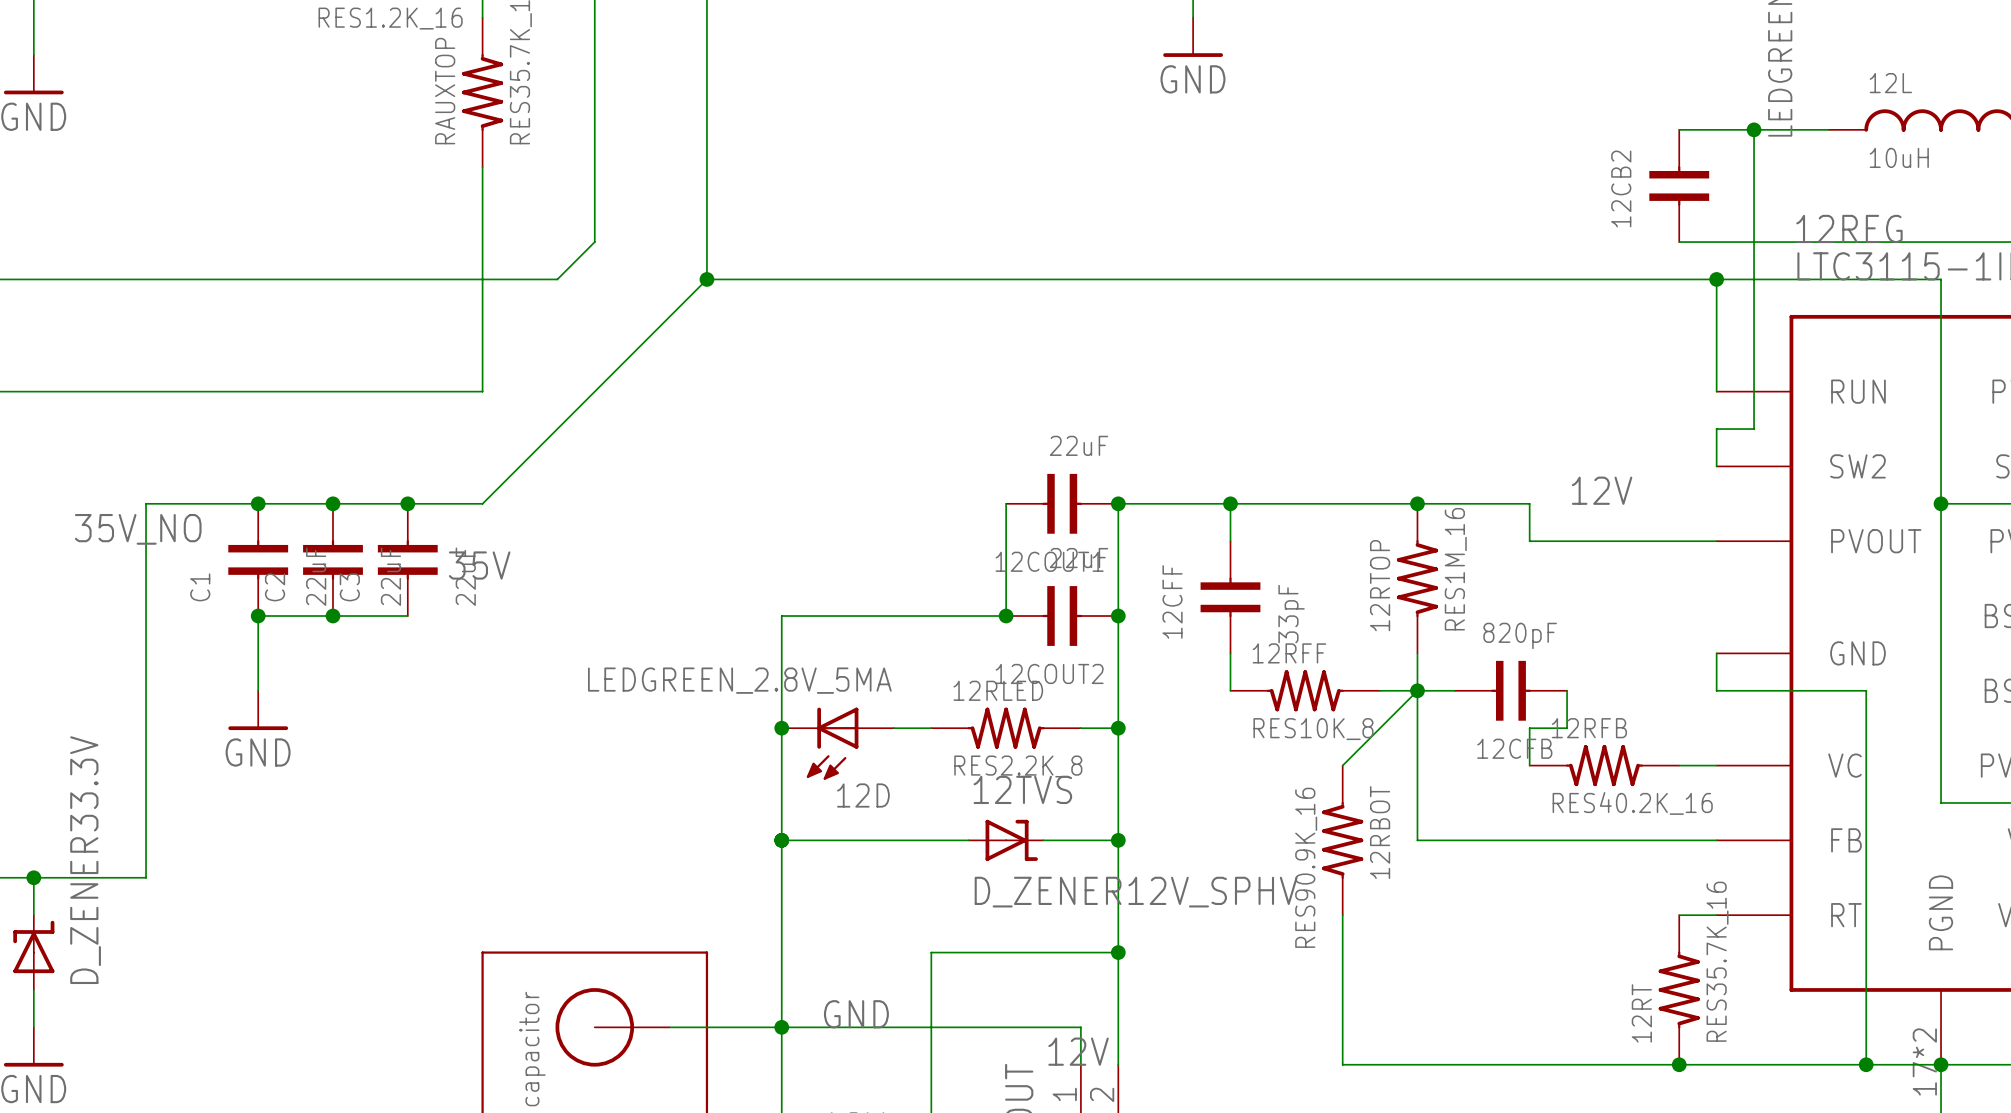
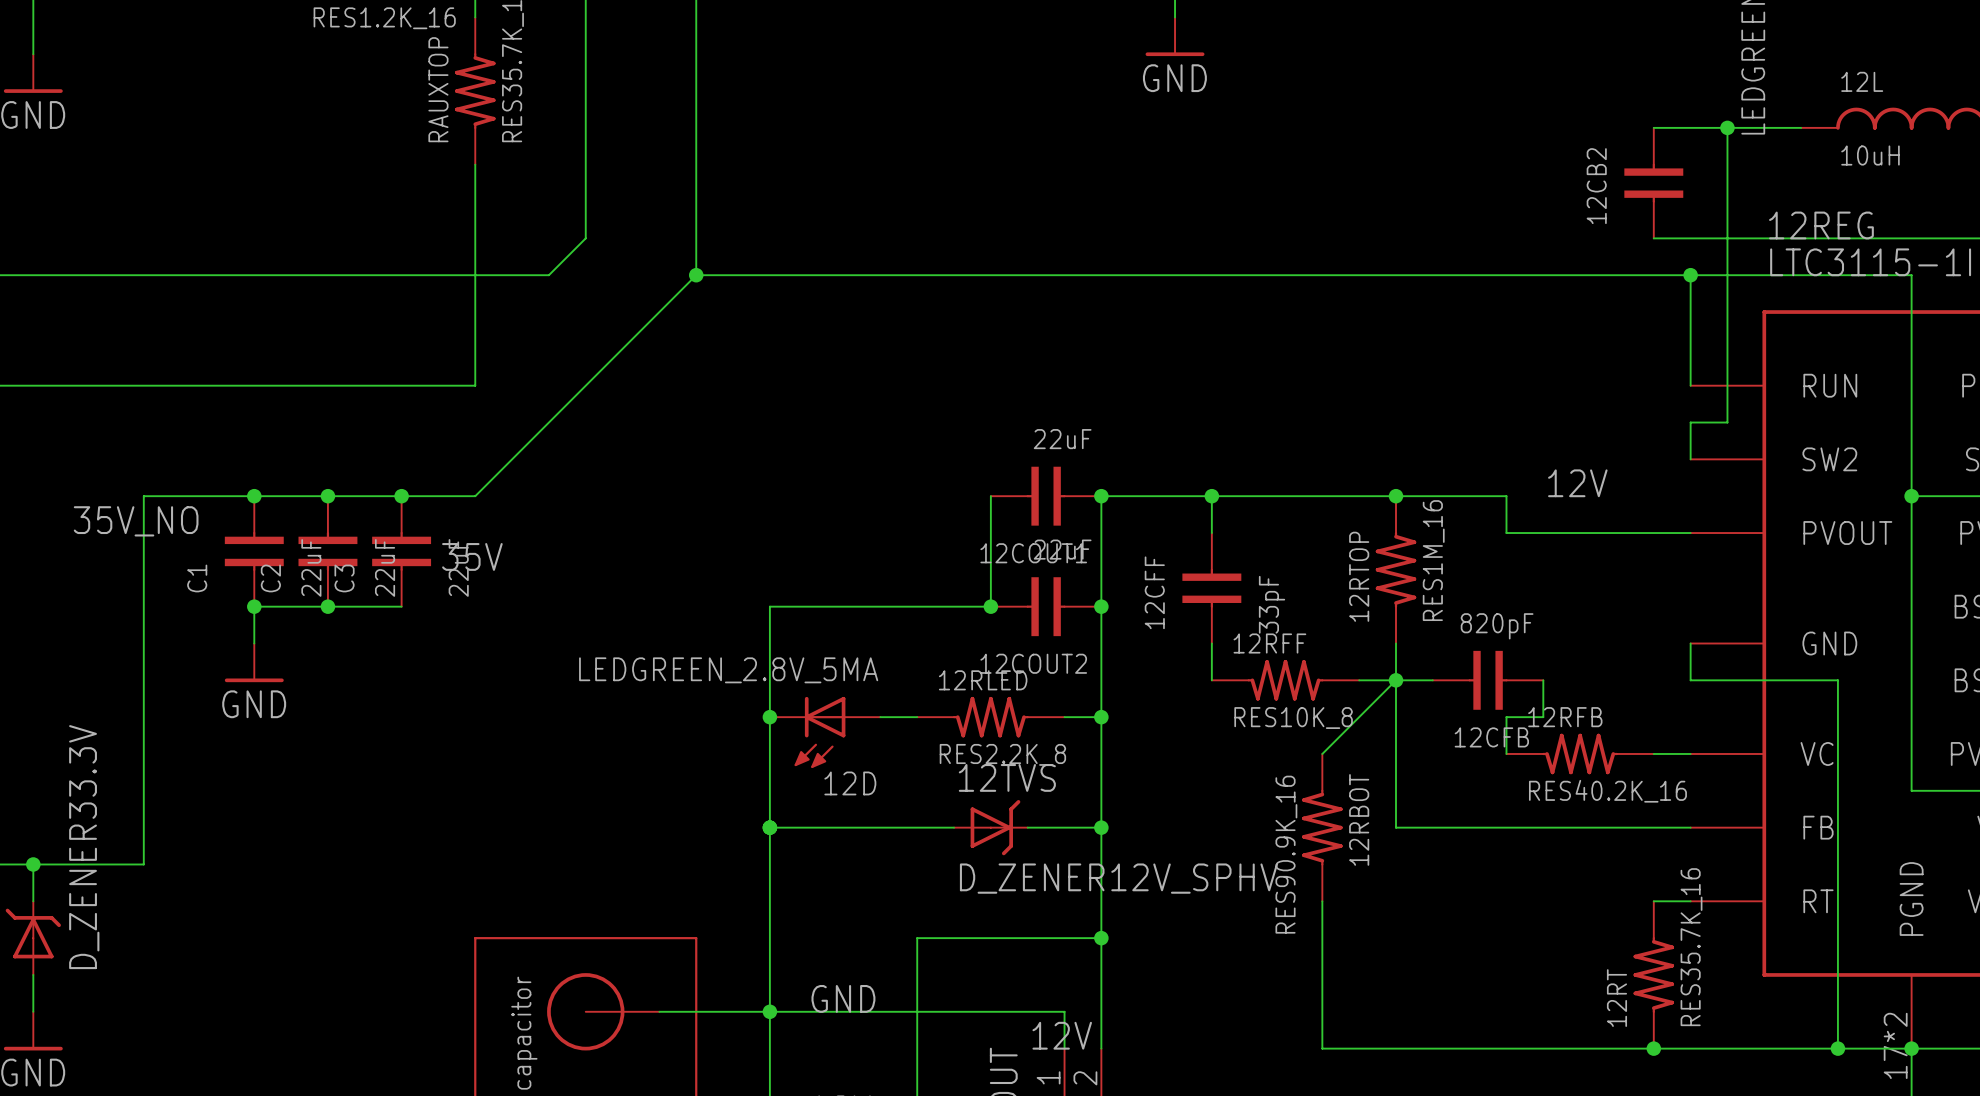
power symbol position: GND (258, 710) -> GND (254, 662)
12TVS symbol: [968, 819, 1044, 861] -> [954, 800, 1028, 856]
part symbol: [13, 915, 55, 990] -> [5, 901, 61, 975]

